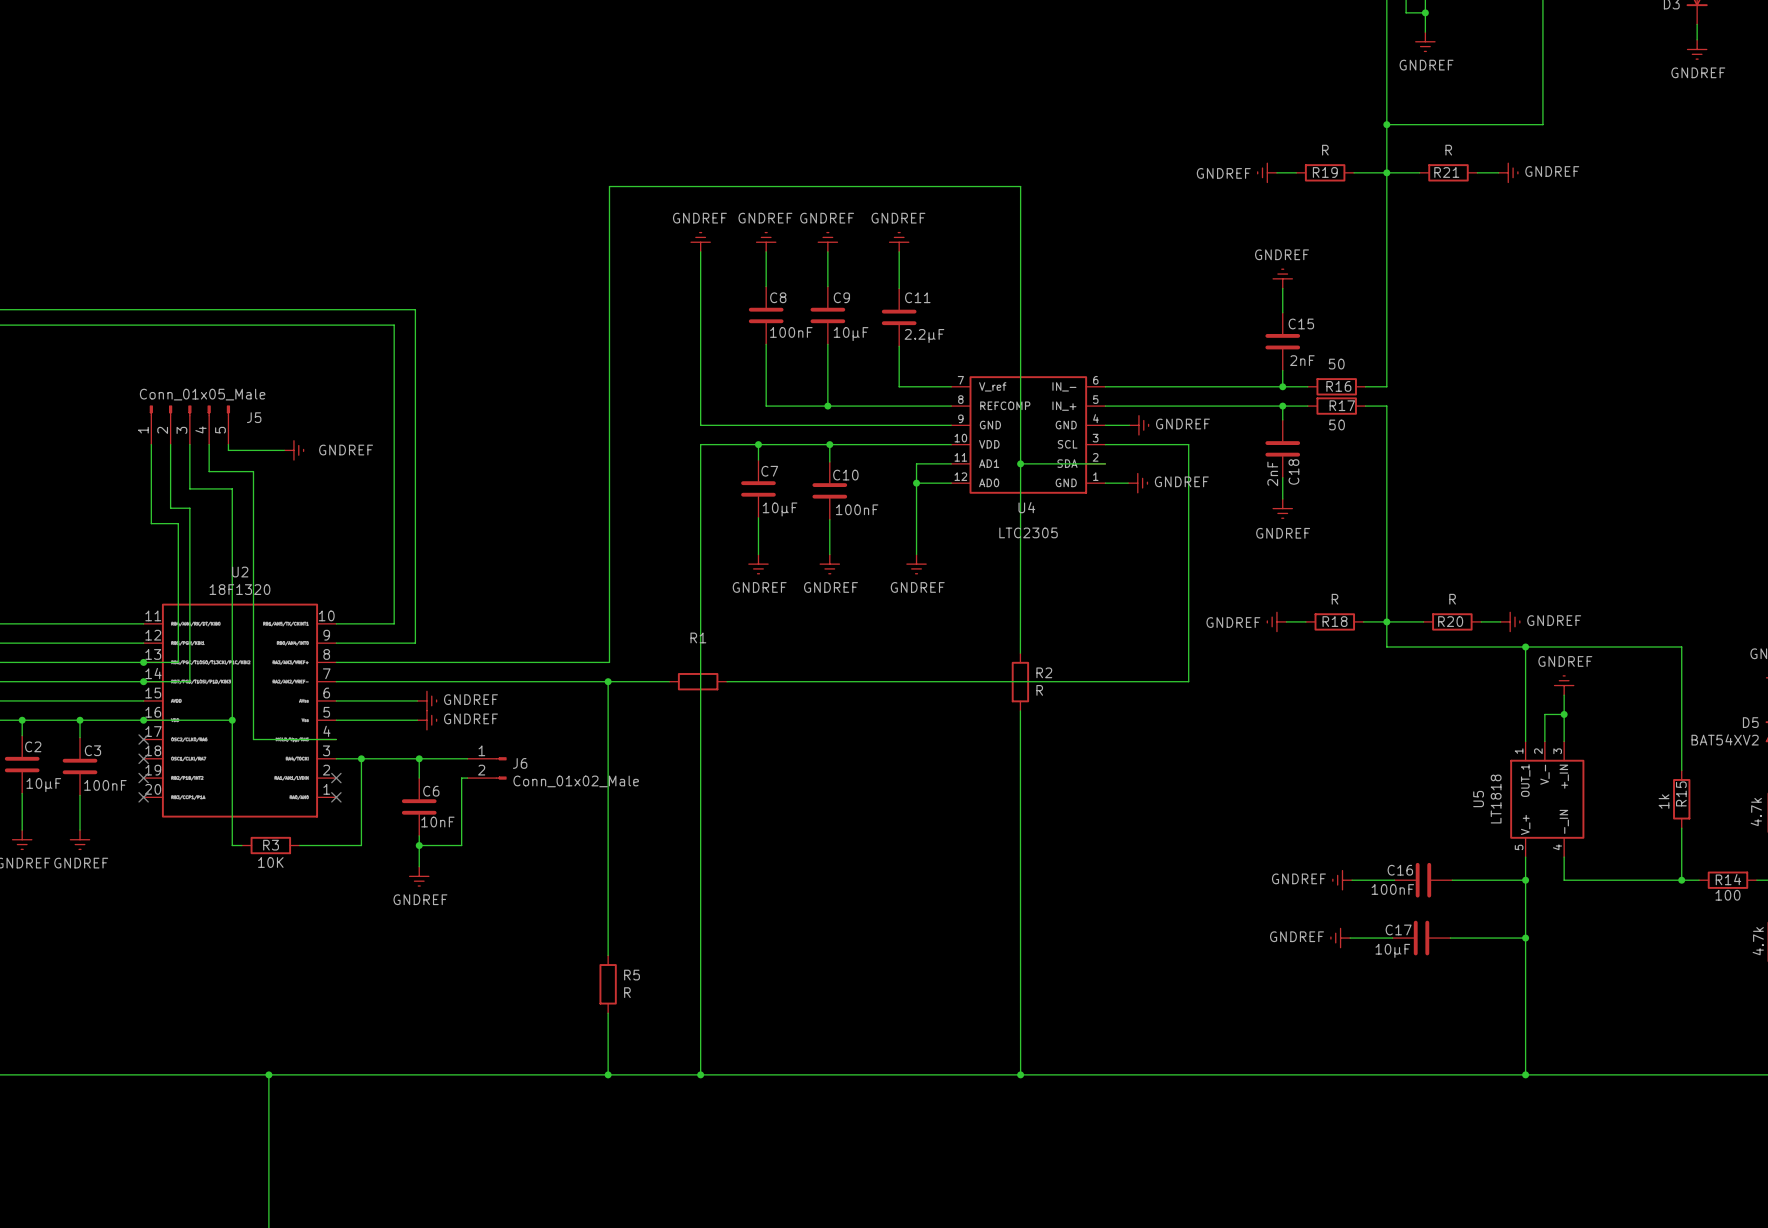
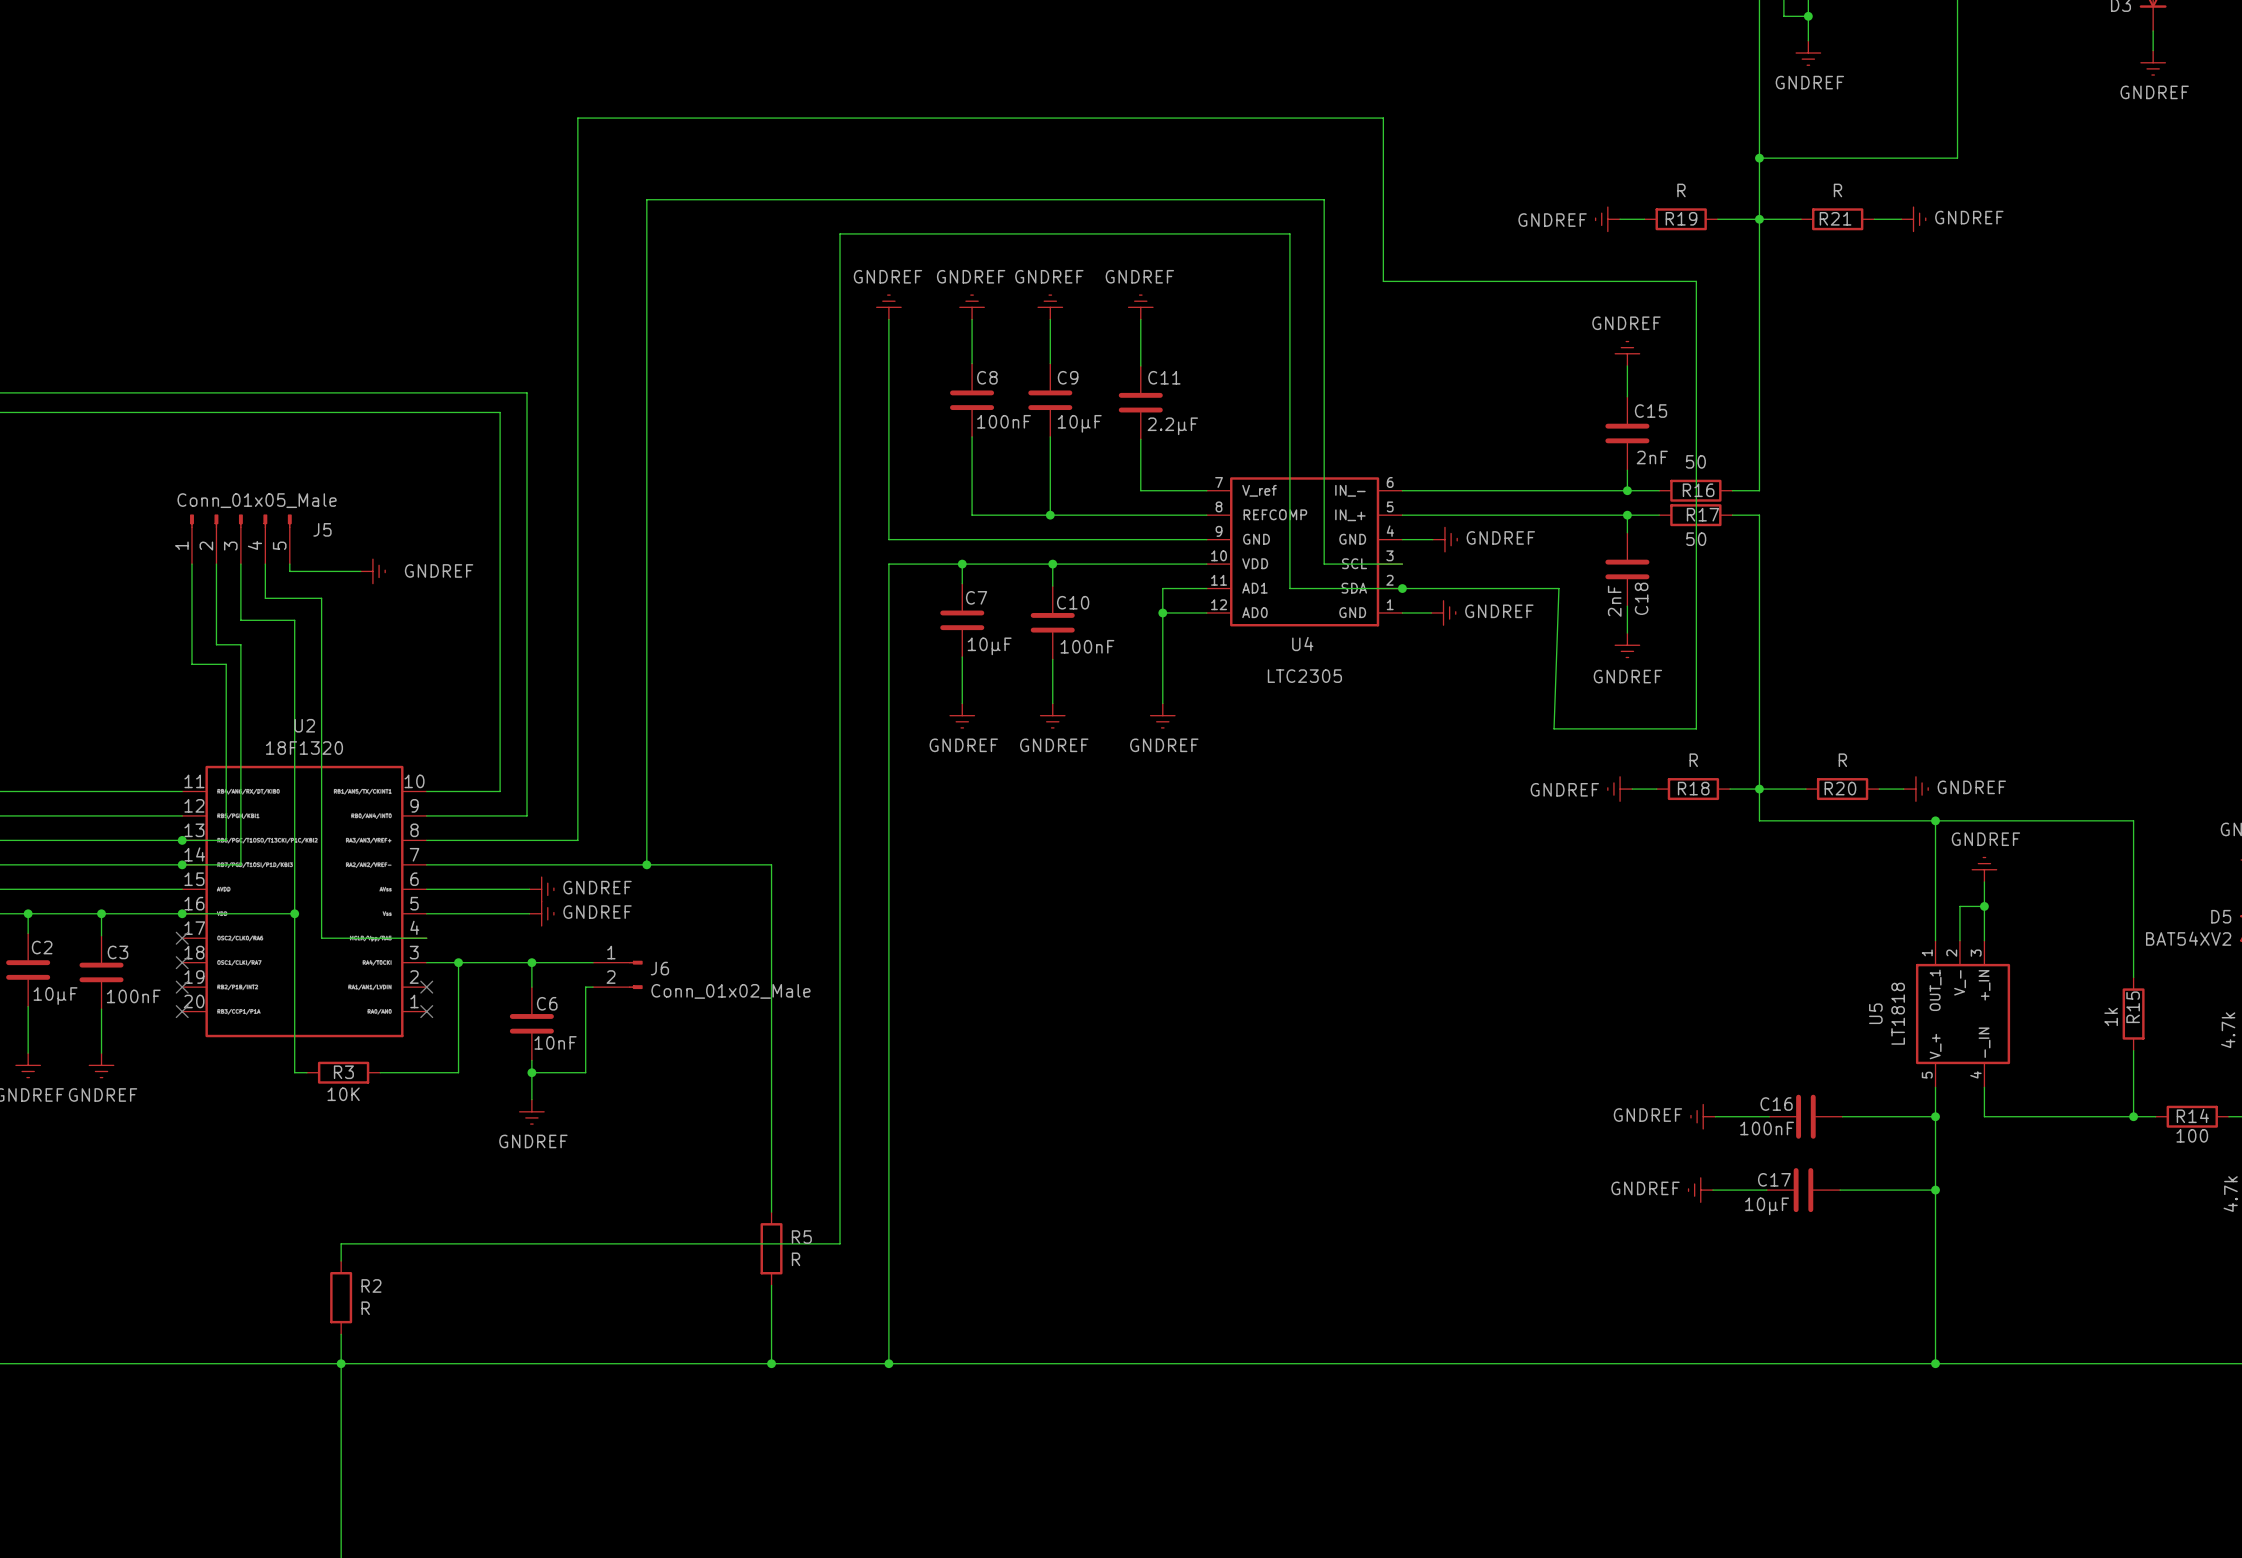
wire: (1105, 444) (1188, 444) (1188, 681) (727, 681) -> (1402, 564) (1324, 564) (1324, 199) (646, 199) (646, 864)
wire: none -> (1294, 588) (1289, 588) (1289, 233) (840, 233) (840, 1243) (341, 1243) (341, 1261)
junction: (1020, 463) -> none
junction: none -> (1402, 588)
wire: (1020, 653) (1020, 186) (609, 186) (609, 662) (455, 662) -> (1402, 588) (1558, 588) (1554, 728) (1696, 728) (1696, 281) (1383, 281) (1383, 118) (577, 118) (577, 840)
junction: none -> (646, 864)
wire: (608, 681) (669, 681) -> none
junction: (608, 681) -> none
R1: (698, 681) -> none
R2 position: (1020, 682) -> (341, 1297)
wire: (1020, 710) (1020, 1074) -> none
wire: none -> (341, 1334) (341, 1363)
junction: (1020, 1074) -> none

